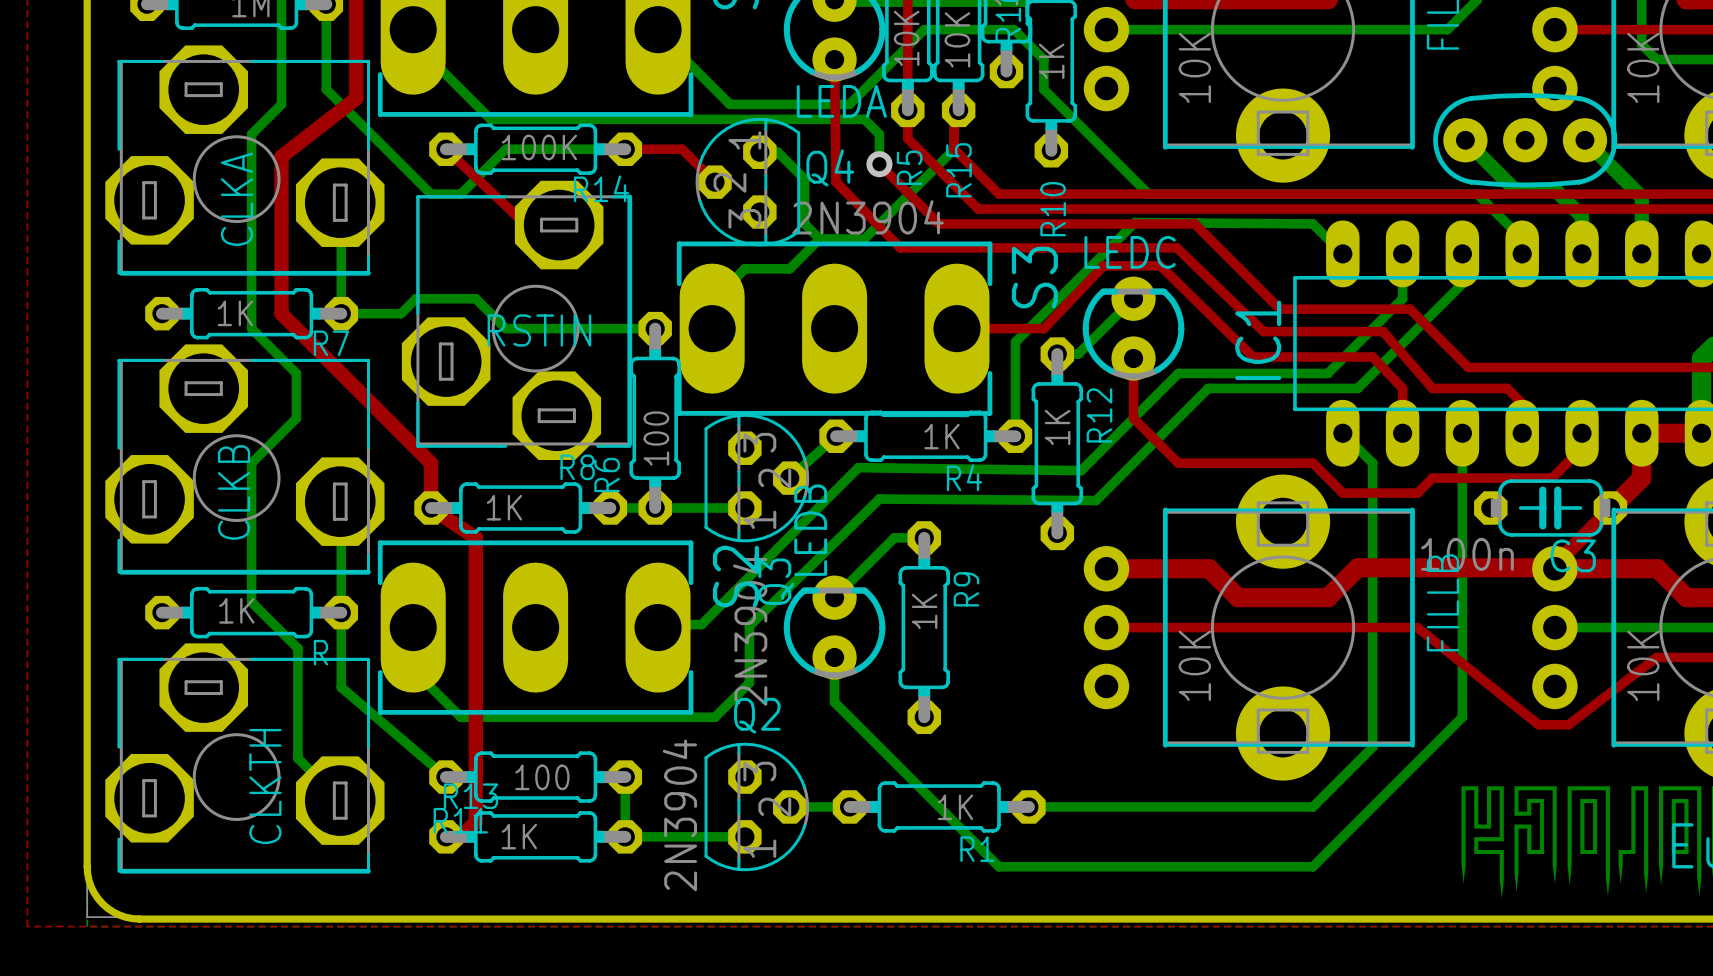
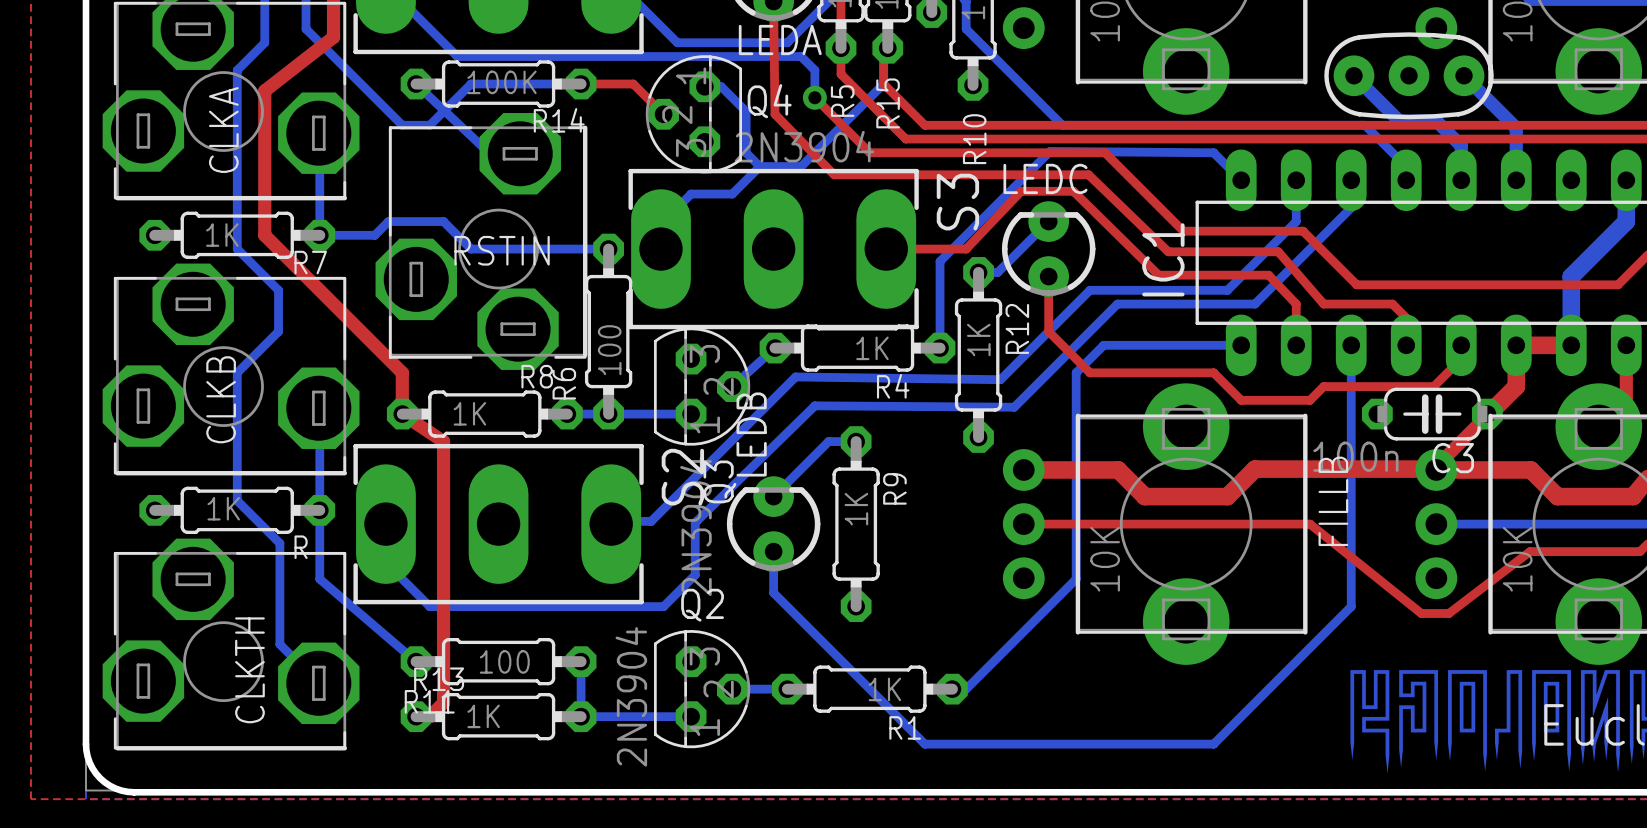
bottom track: none -> (416, 84) (489, 153) (520, 153)
top track: (445, 149) (526, 225) (559, 225) -> none
bottom track: (1342, 433) (1372, 463) (1372, 747) (1312, 806) (1043, 806) -> (1241, 345) (1103, 345) (1076, 372) (1076, 579) (966, 689)

